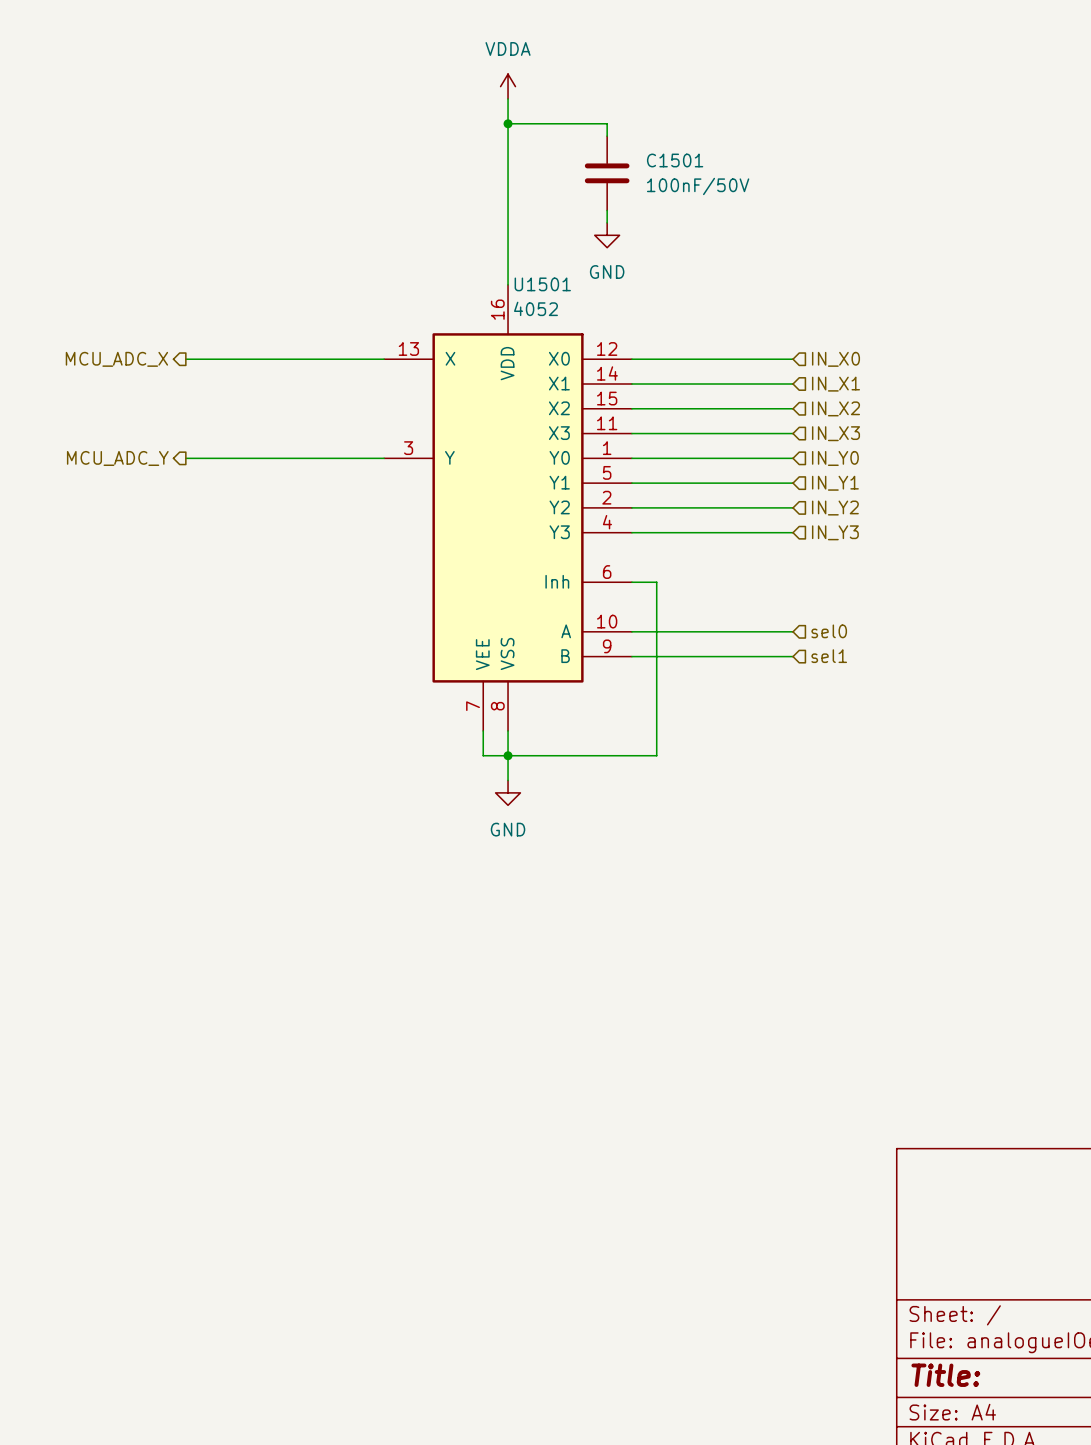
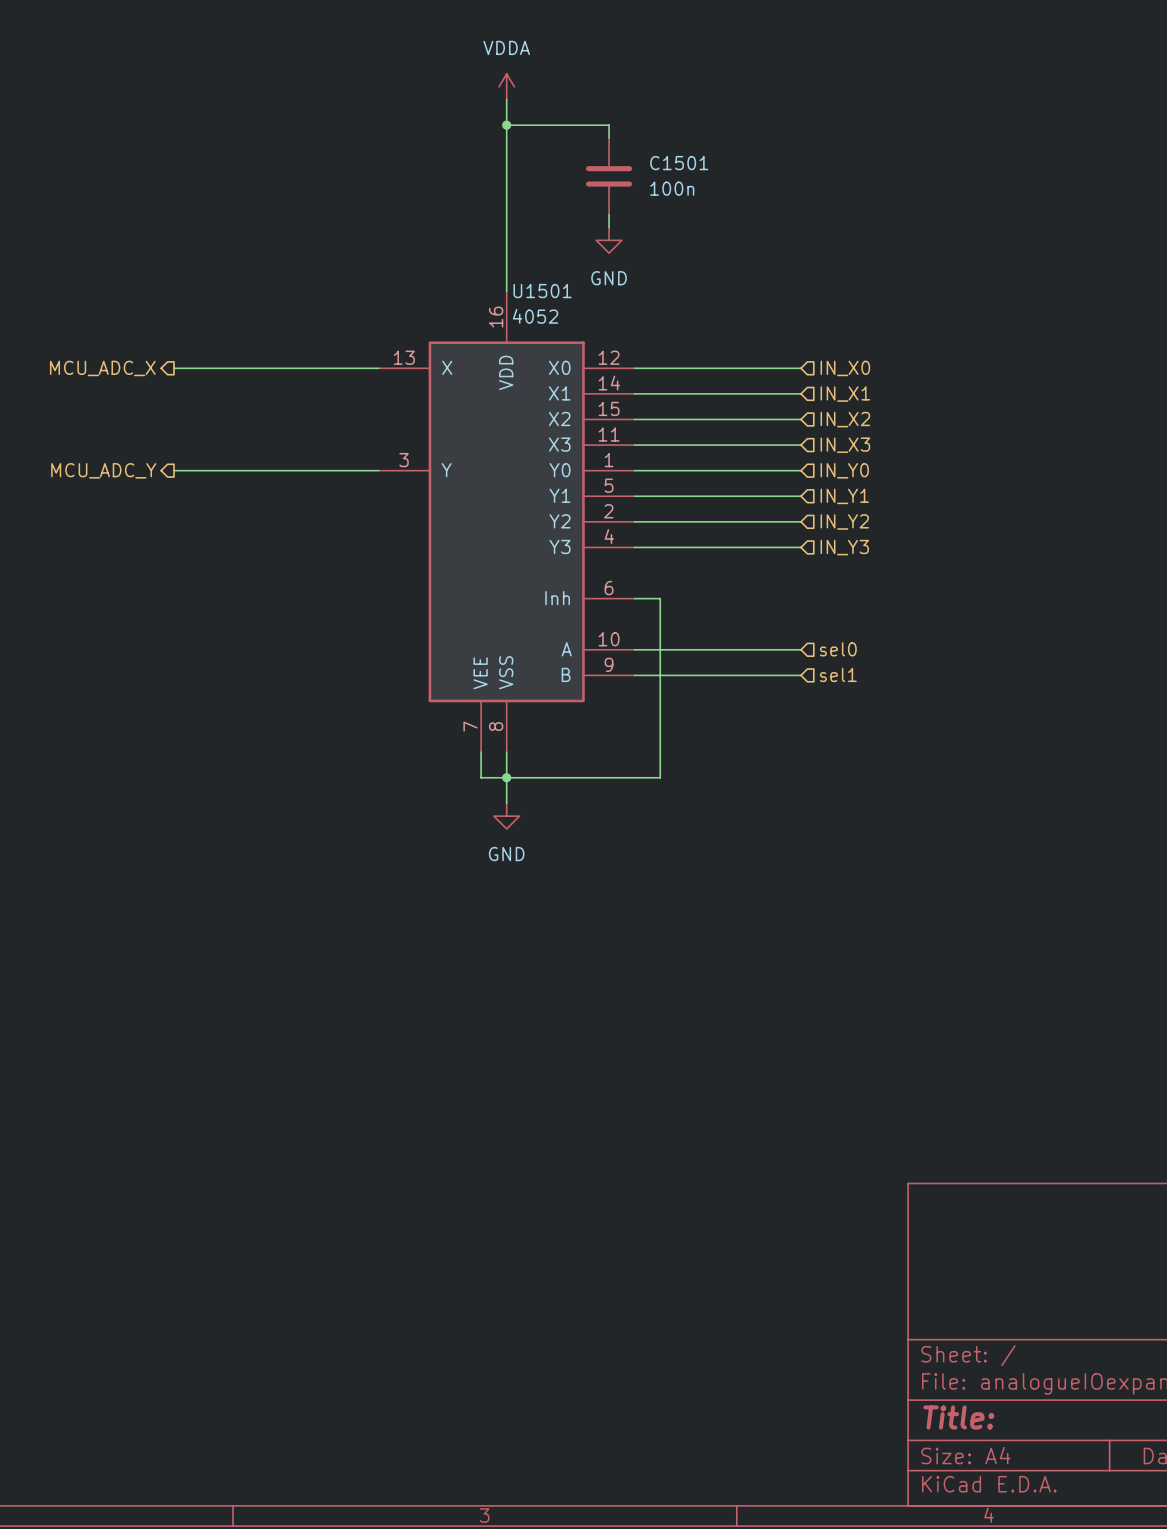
C1501 value: 100nF/50V (698, 186) -> 100n (672, 188)

